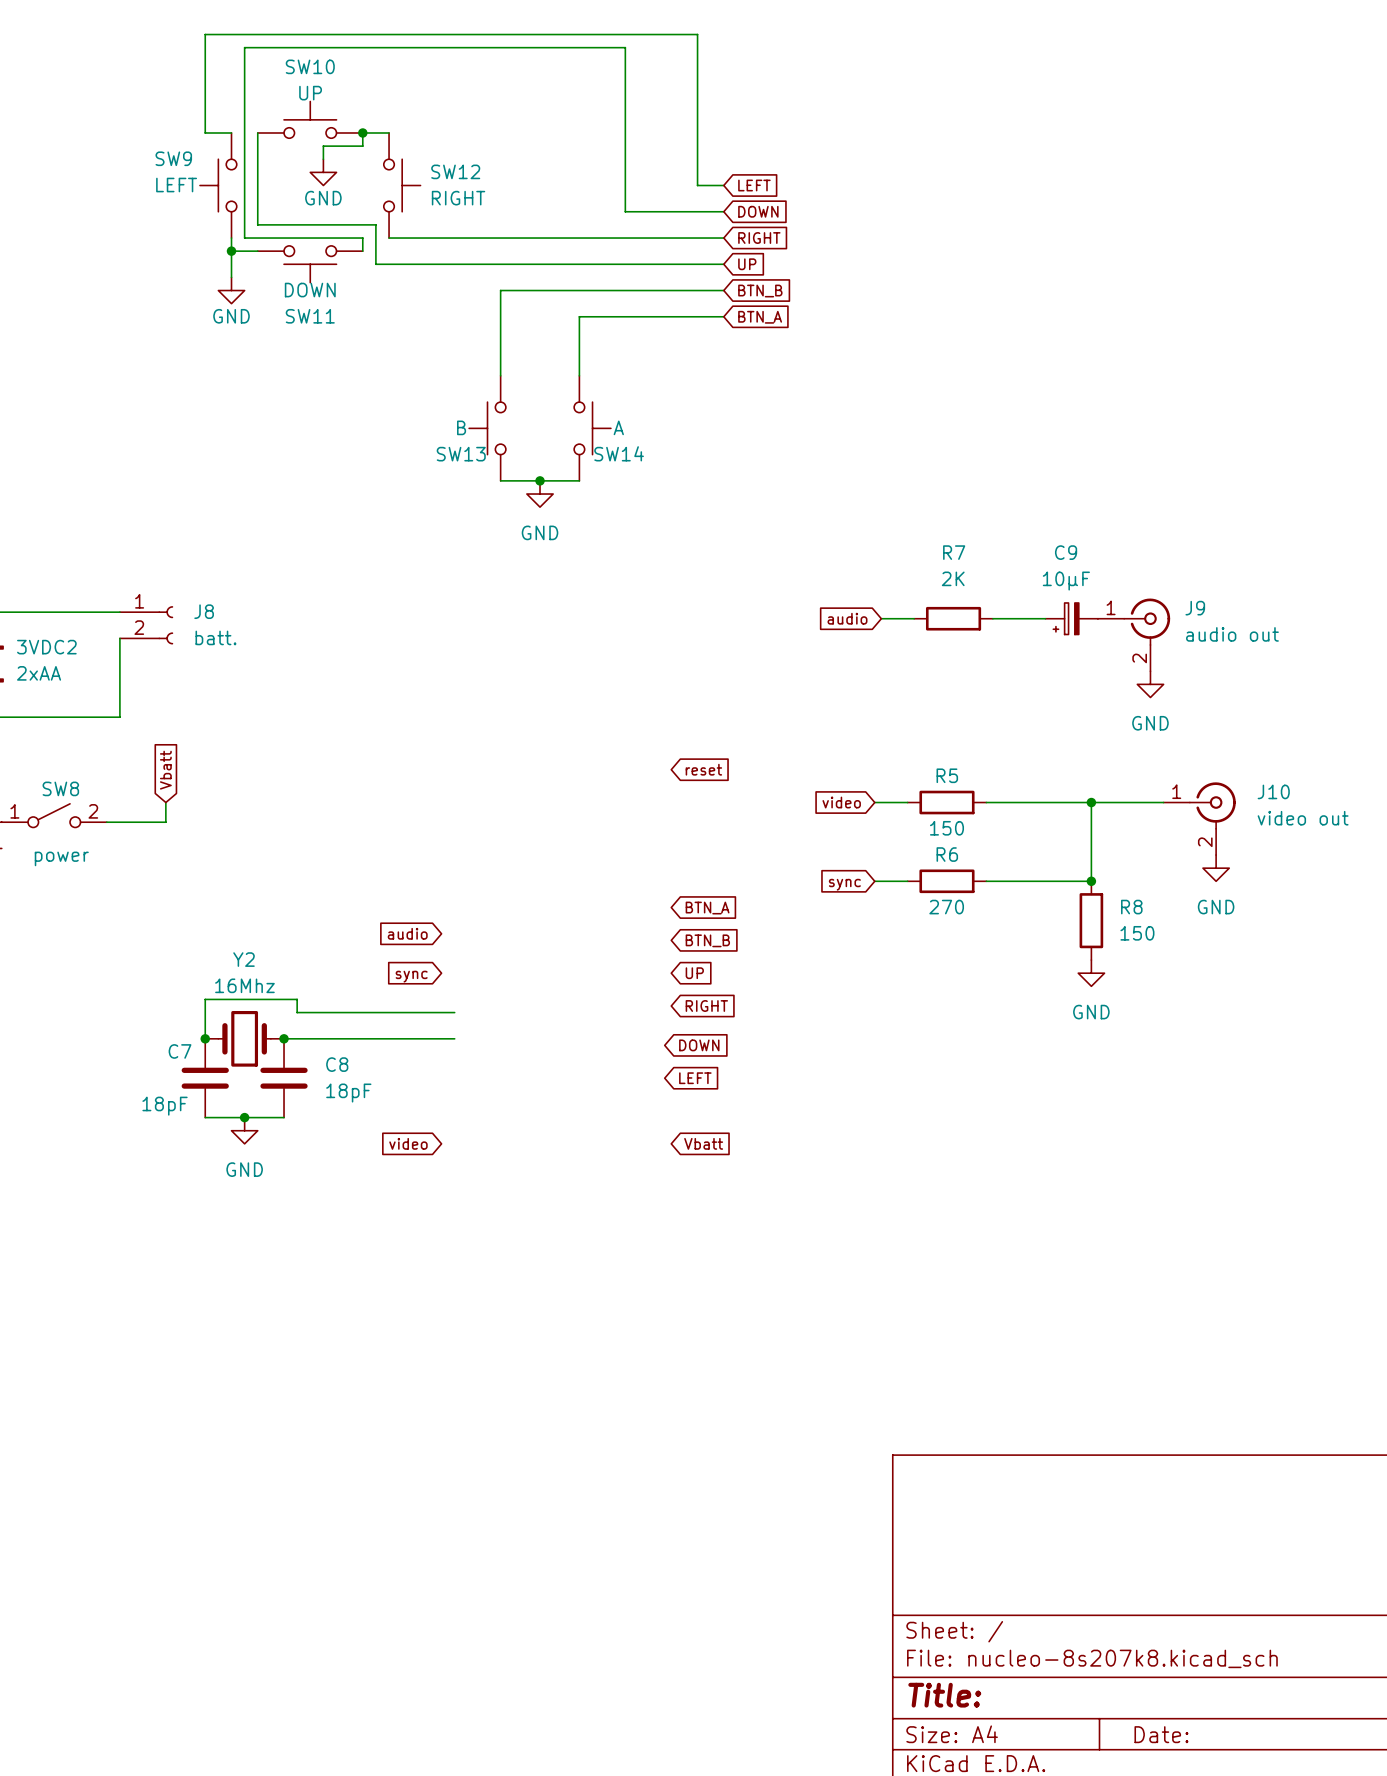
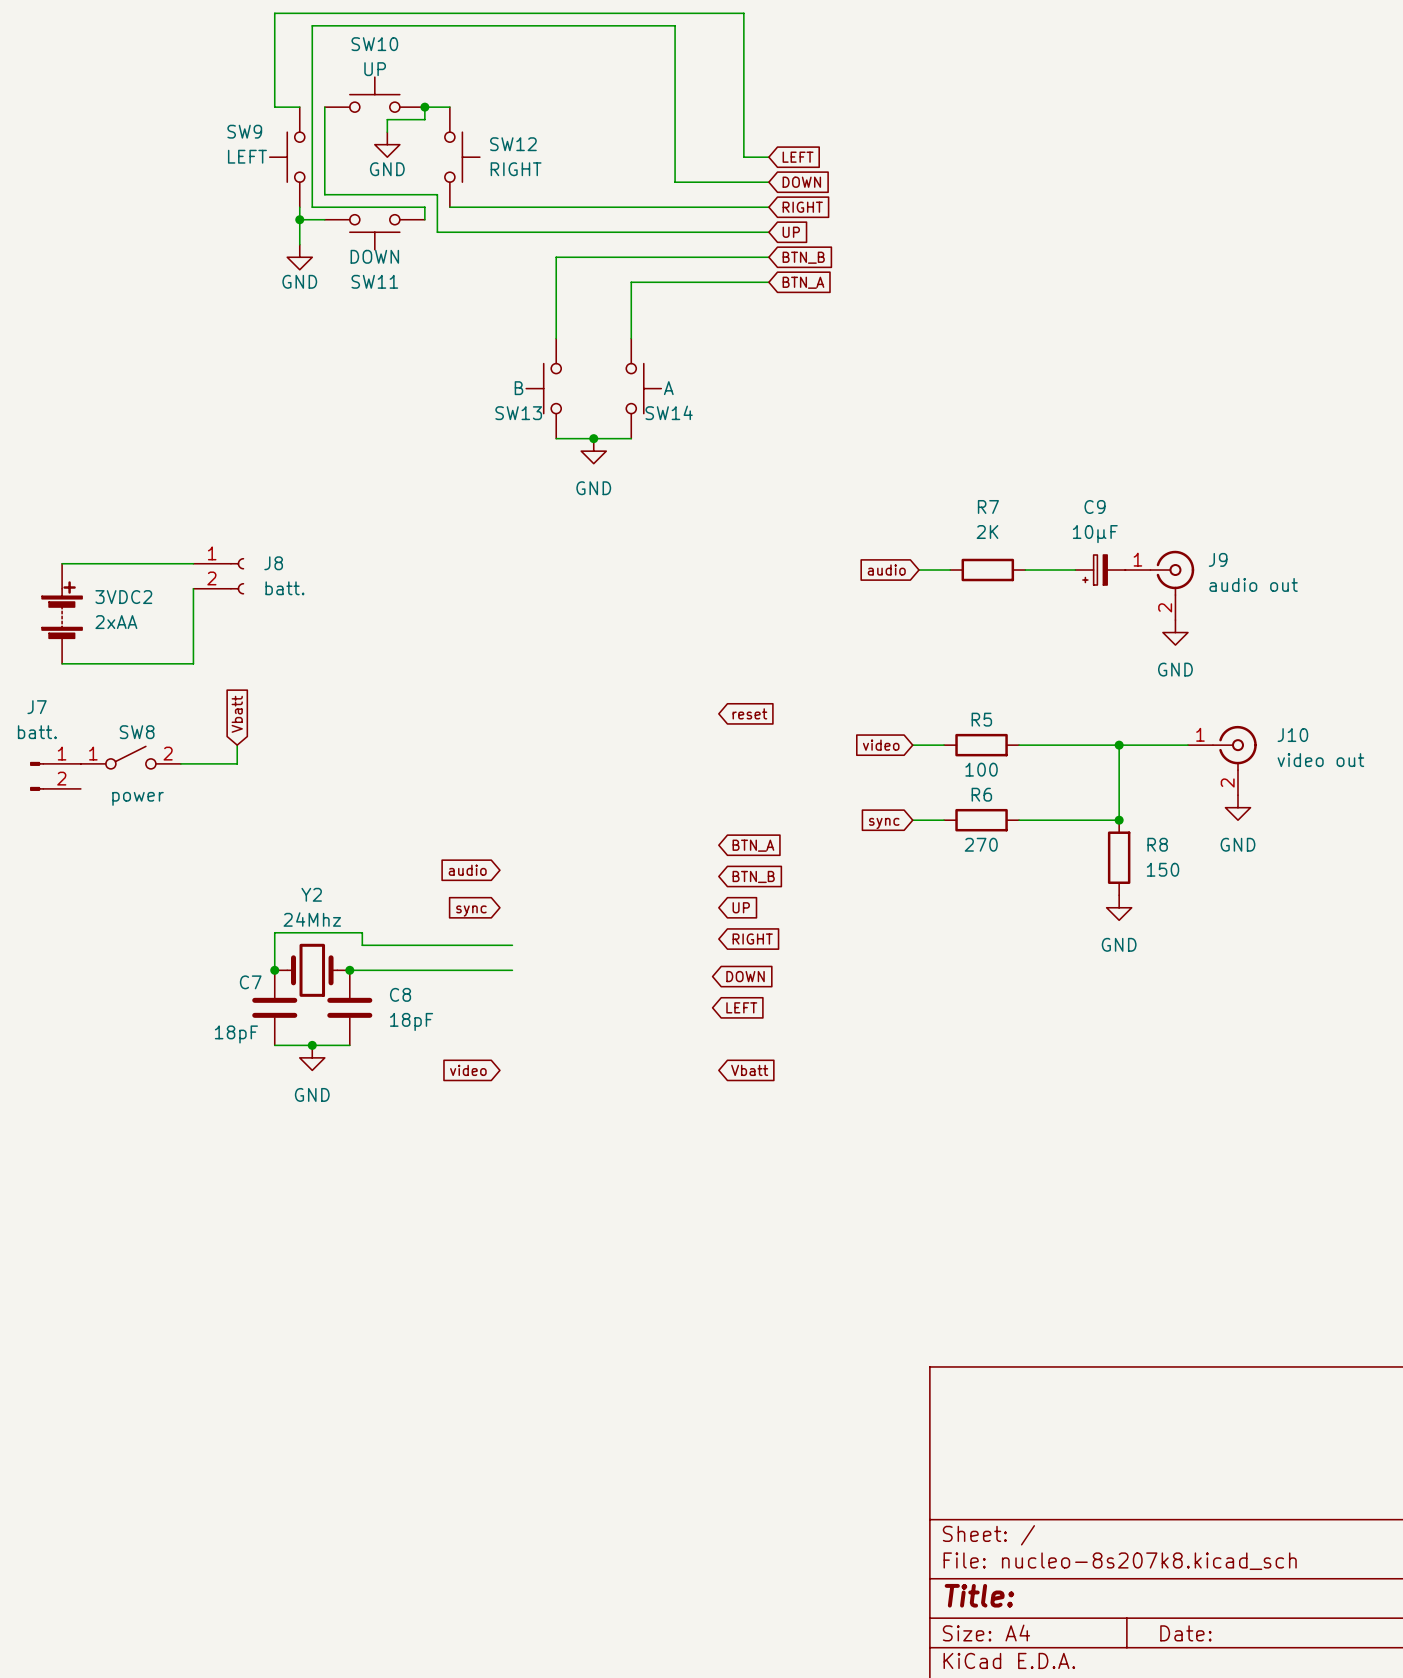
R5 value: 150 (946, 828) -> 100 (981, 769)
Y2 value: 16Mhz (244, 985) -> 24Mhz (312, 919)

